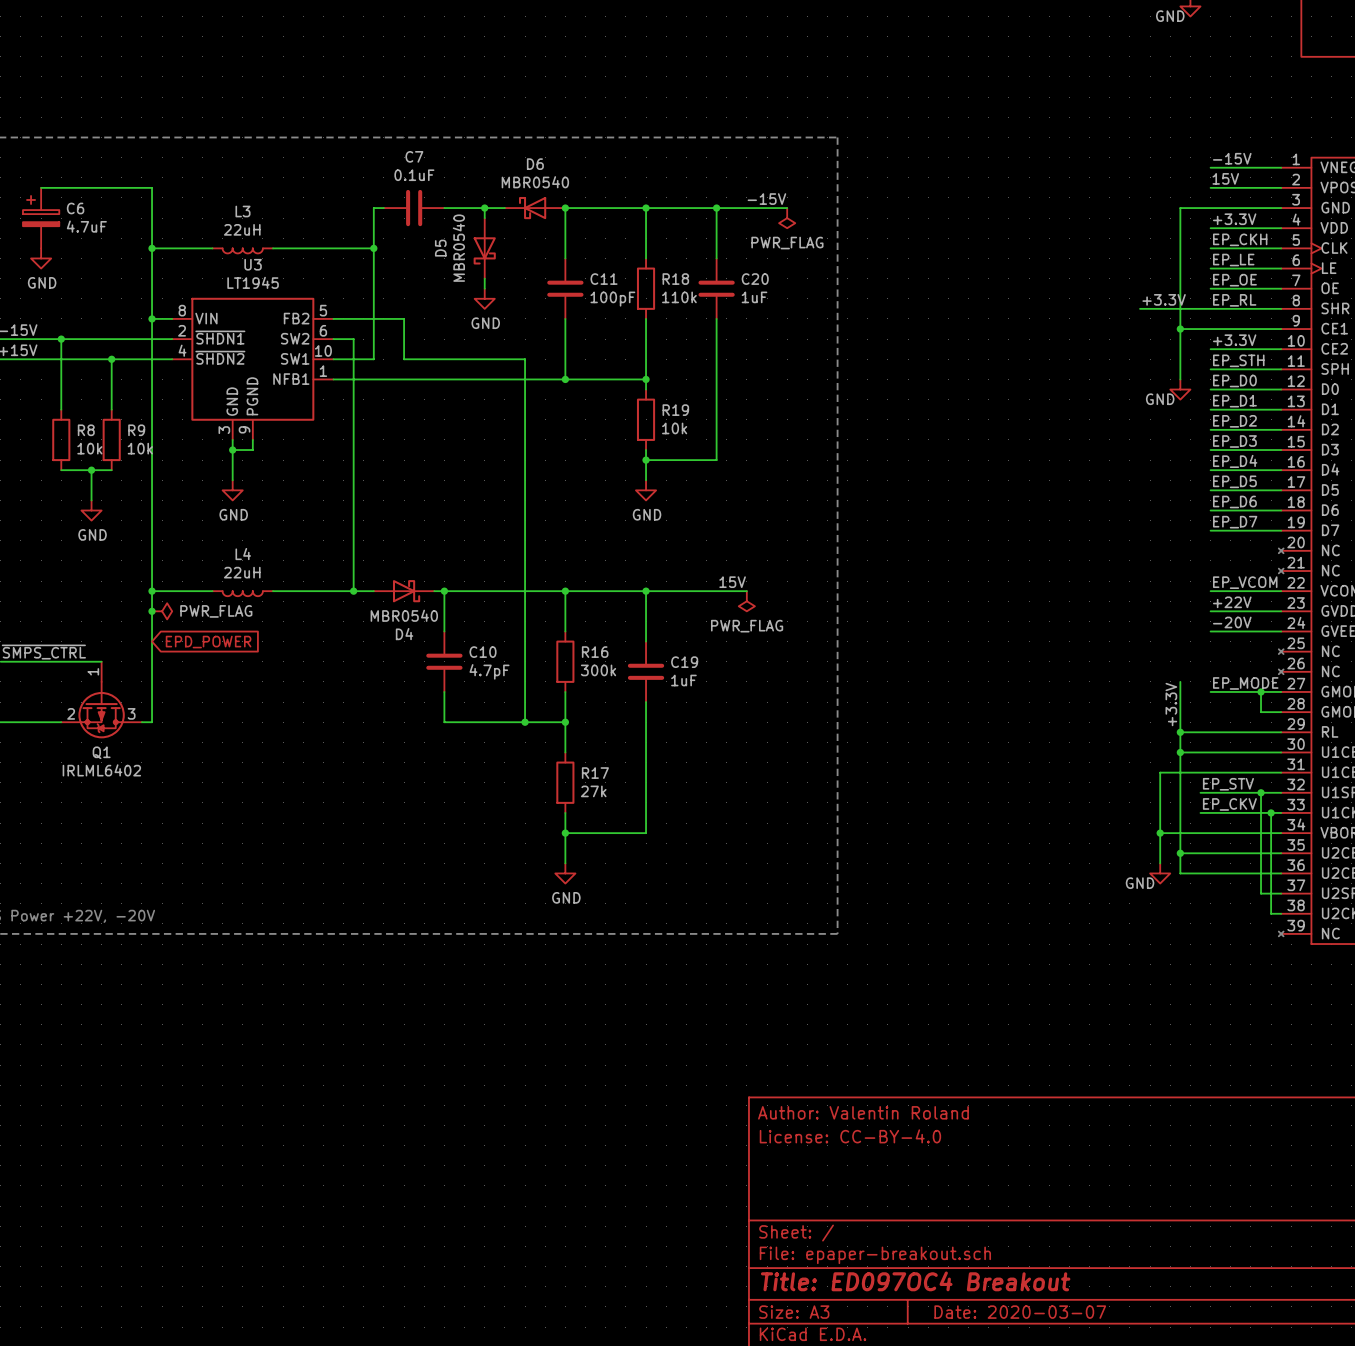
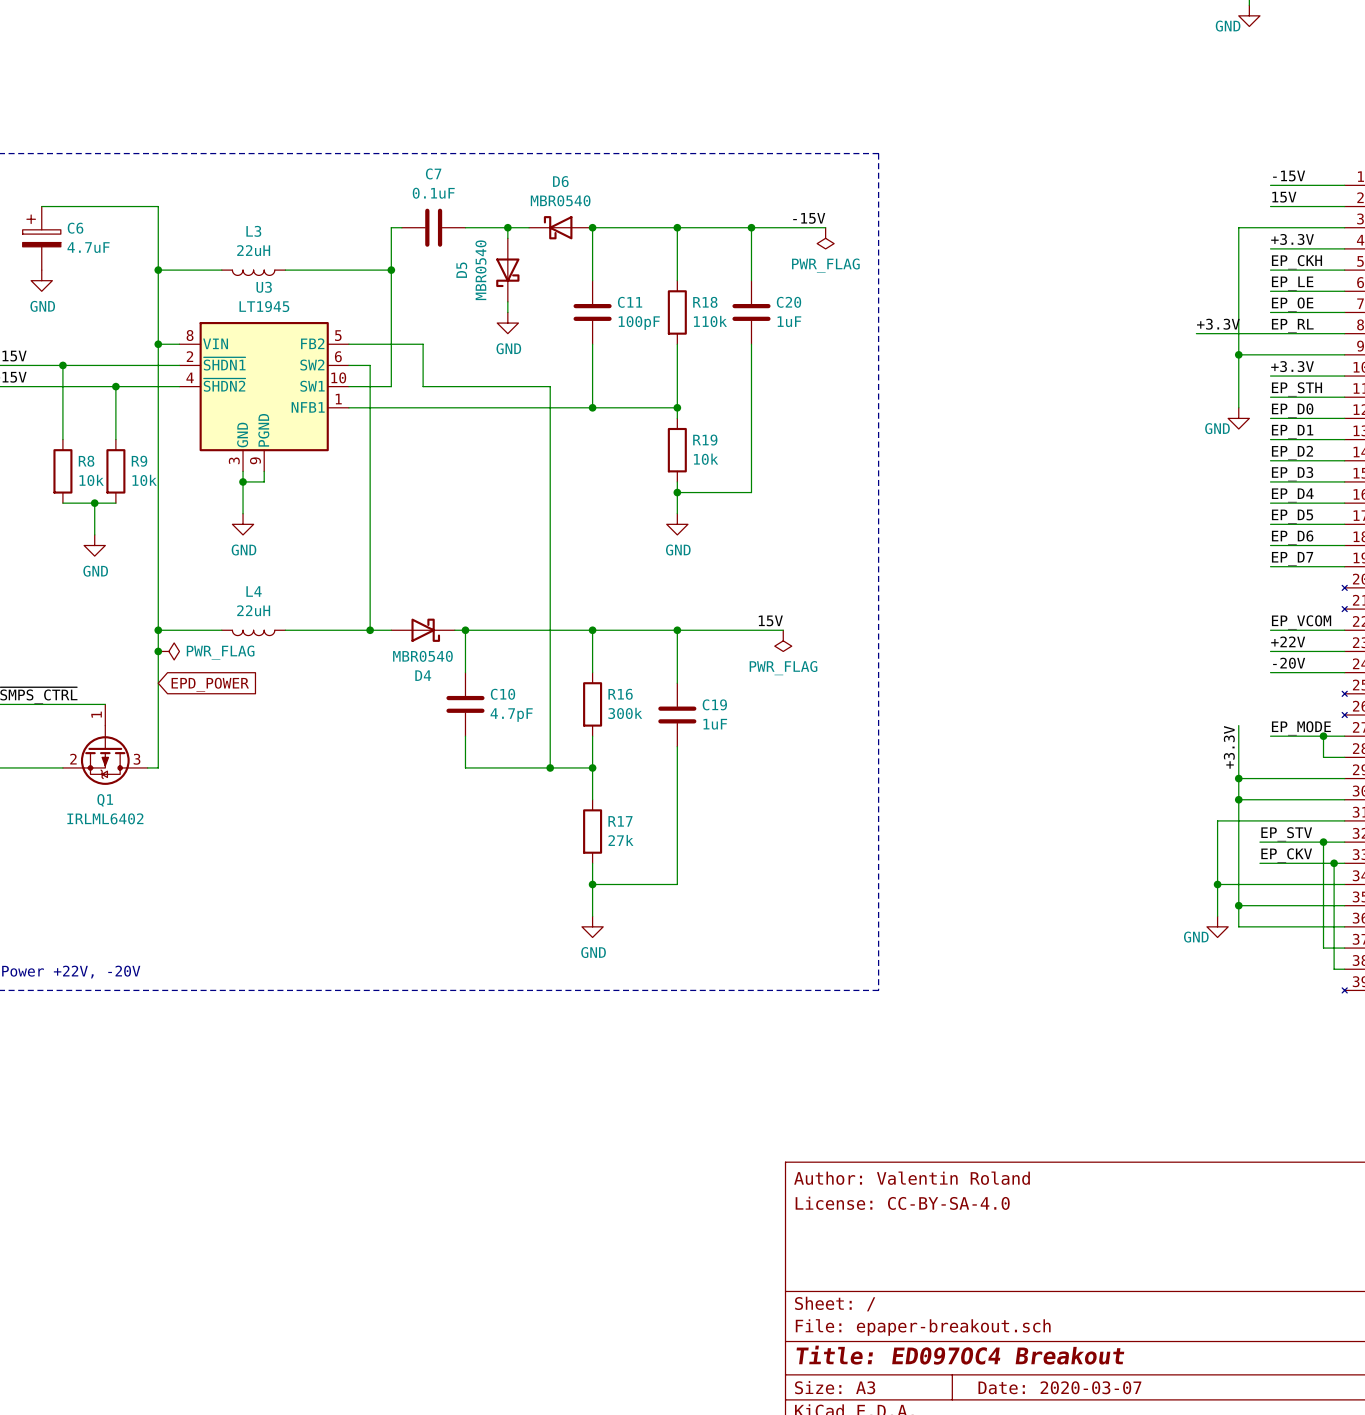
title block: License: CC-BY-4.0 (850, 1136) -> License: CC-BY-SA-4.0 (902, 1203)

